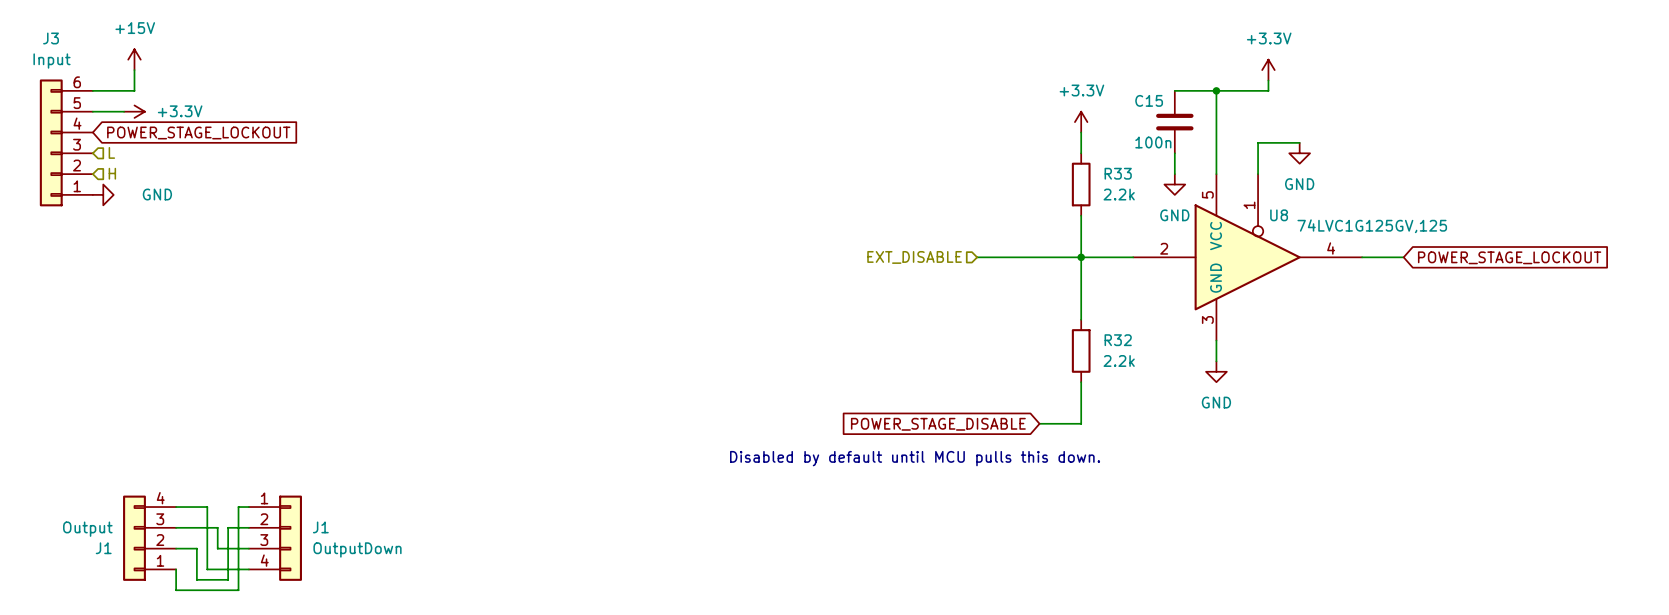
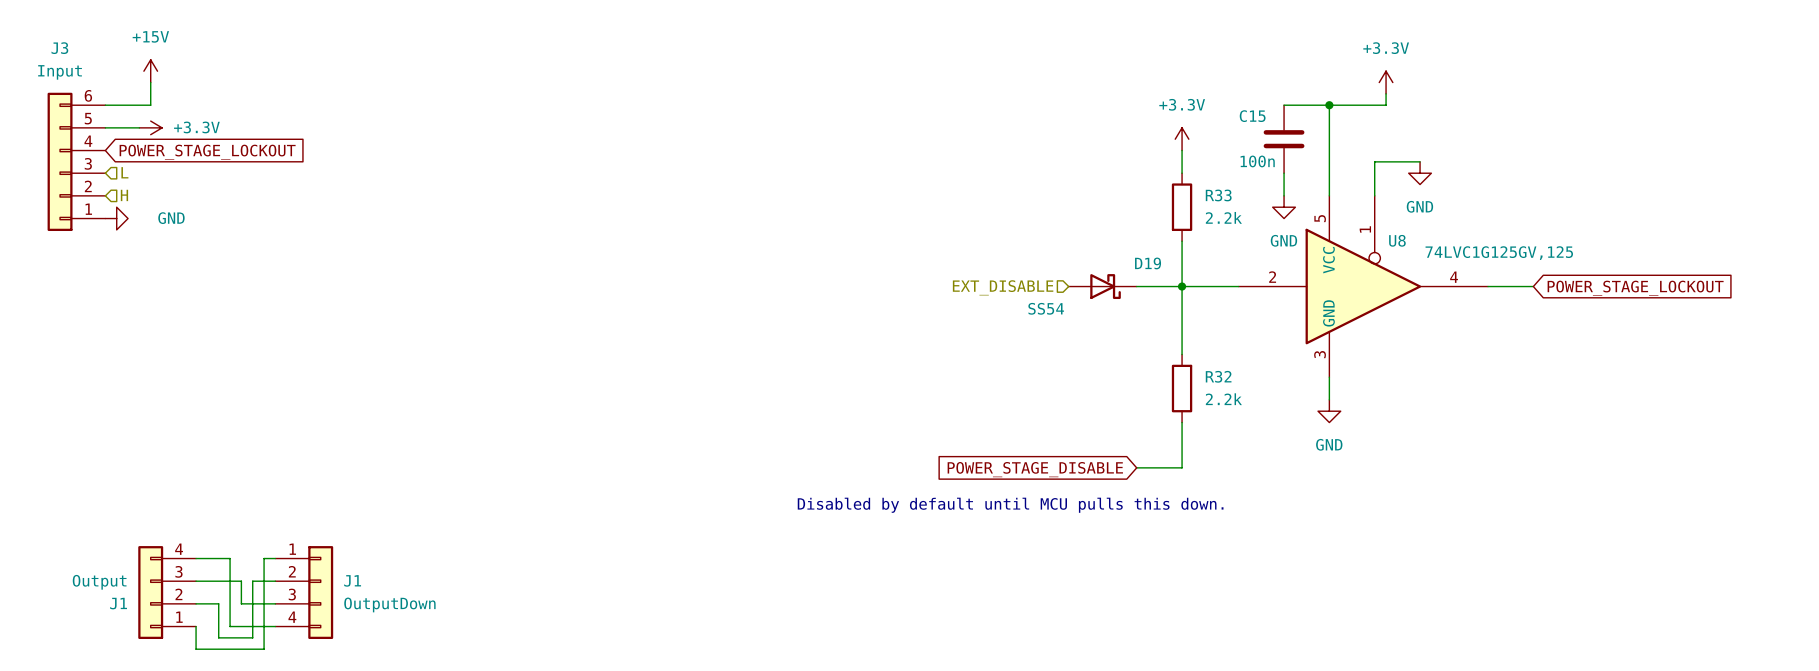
D19: none -> SS54 (1102, 286)

